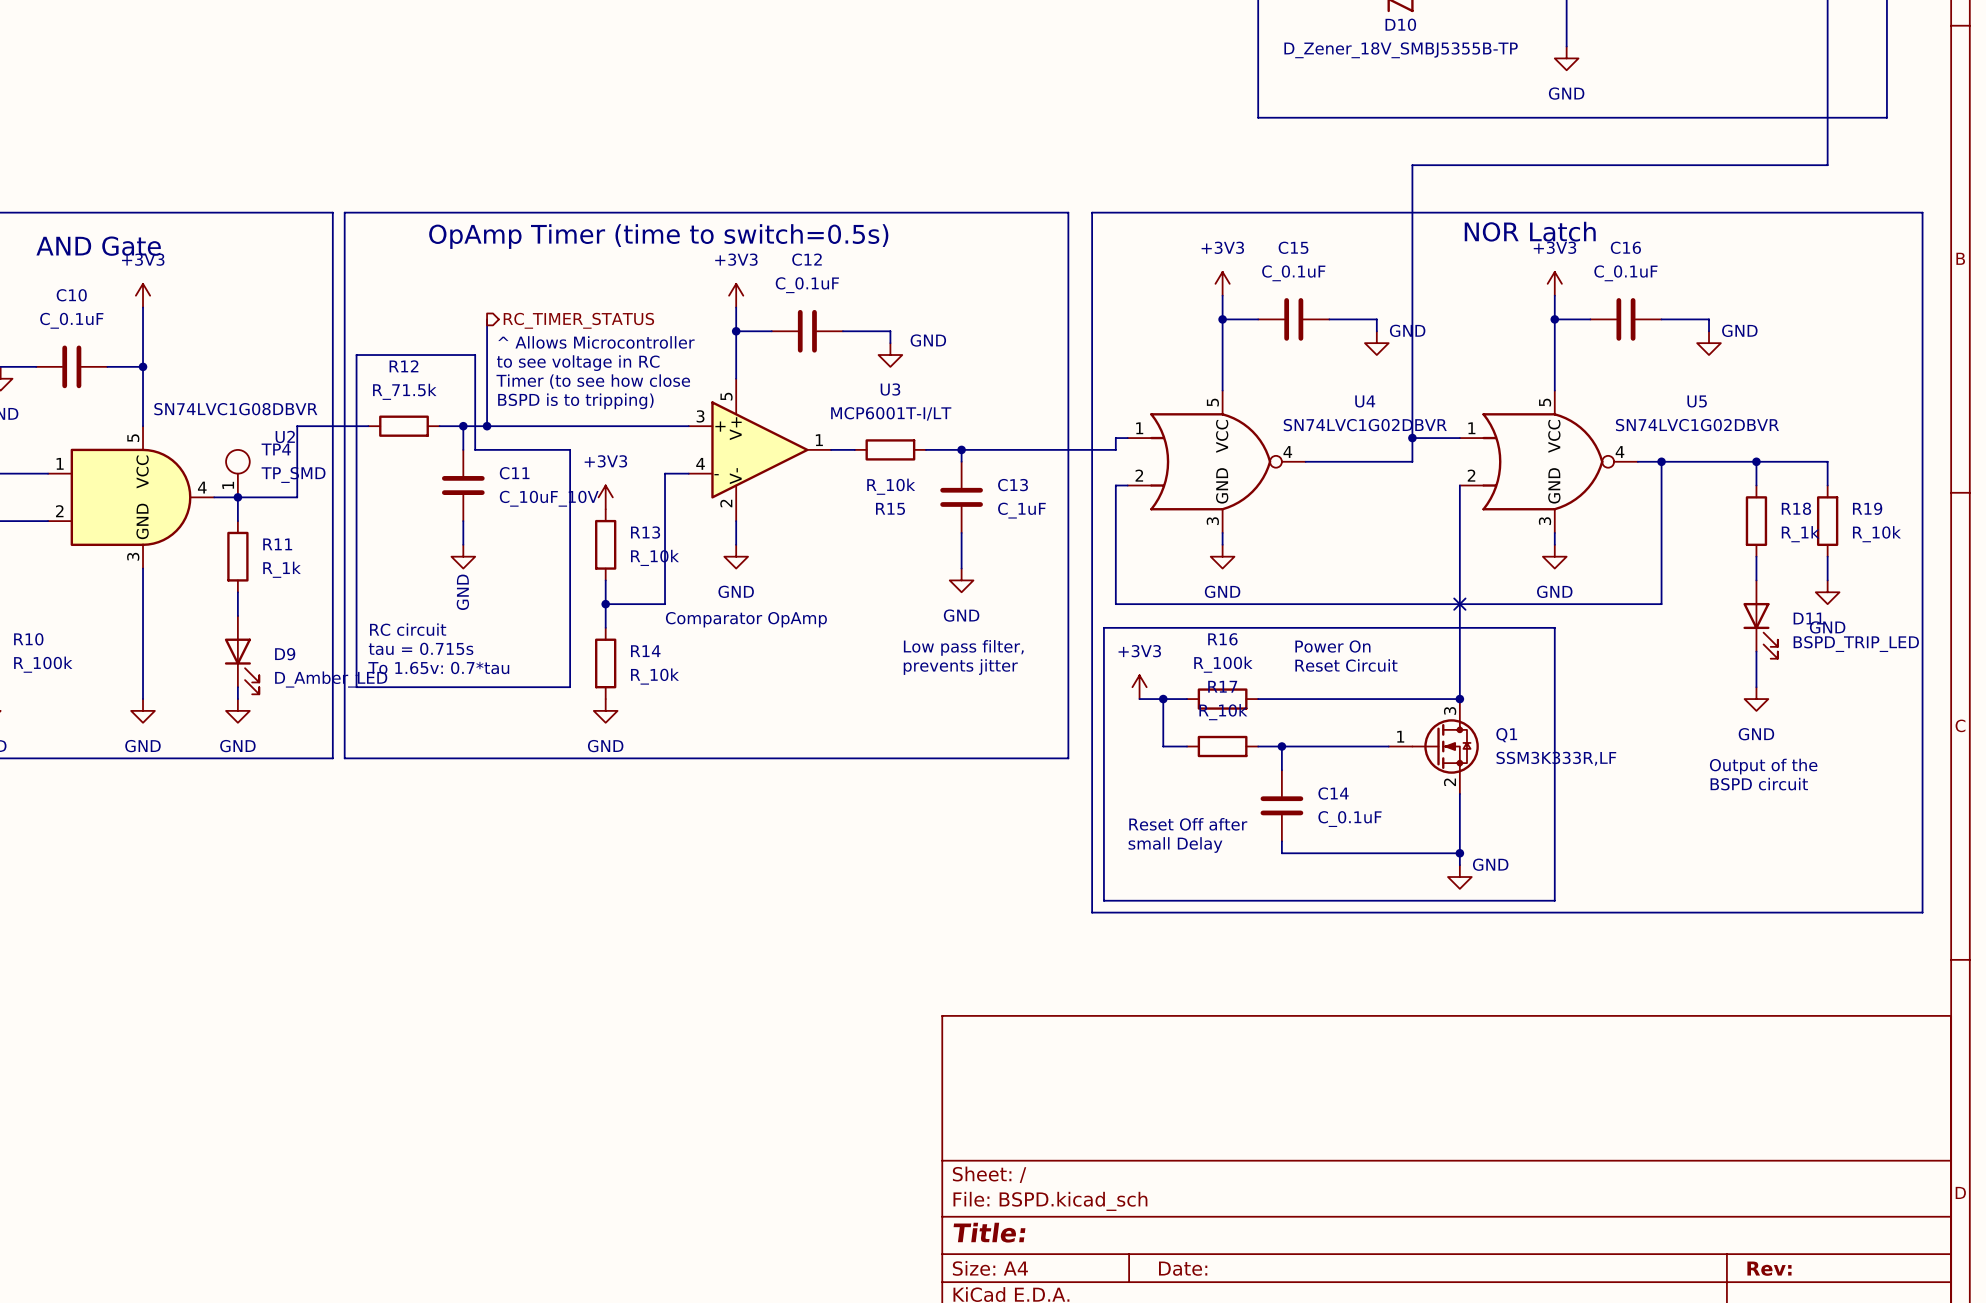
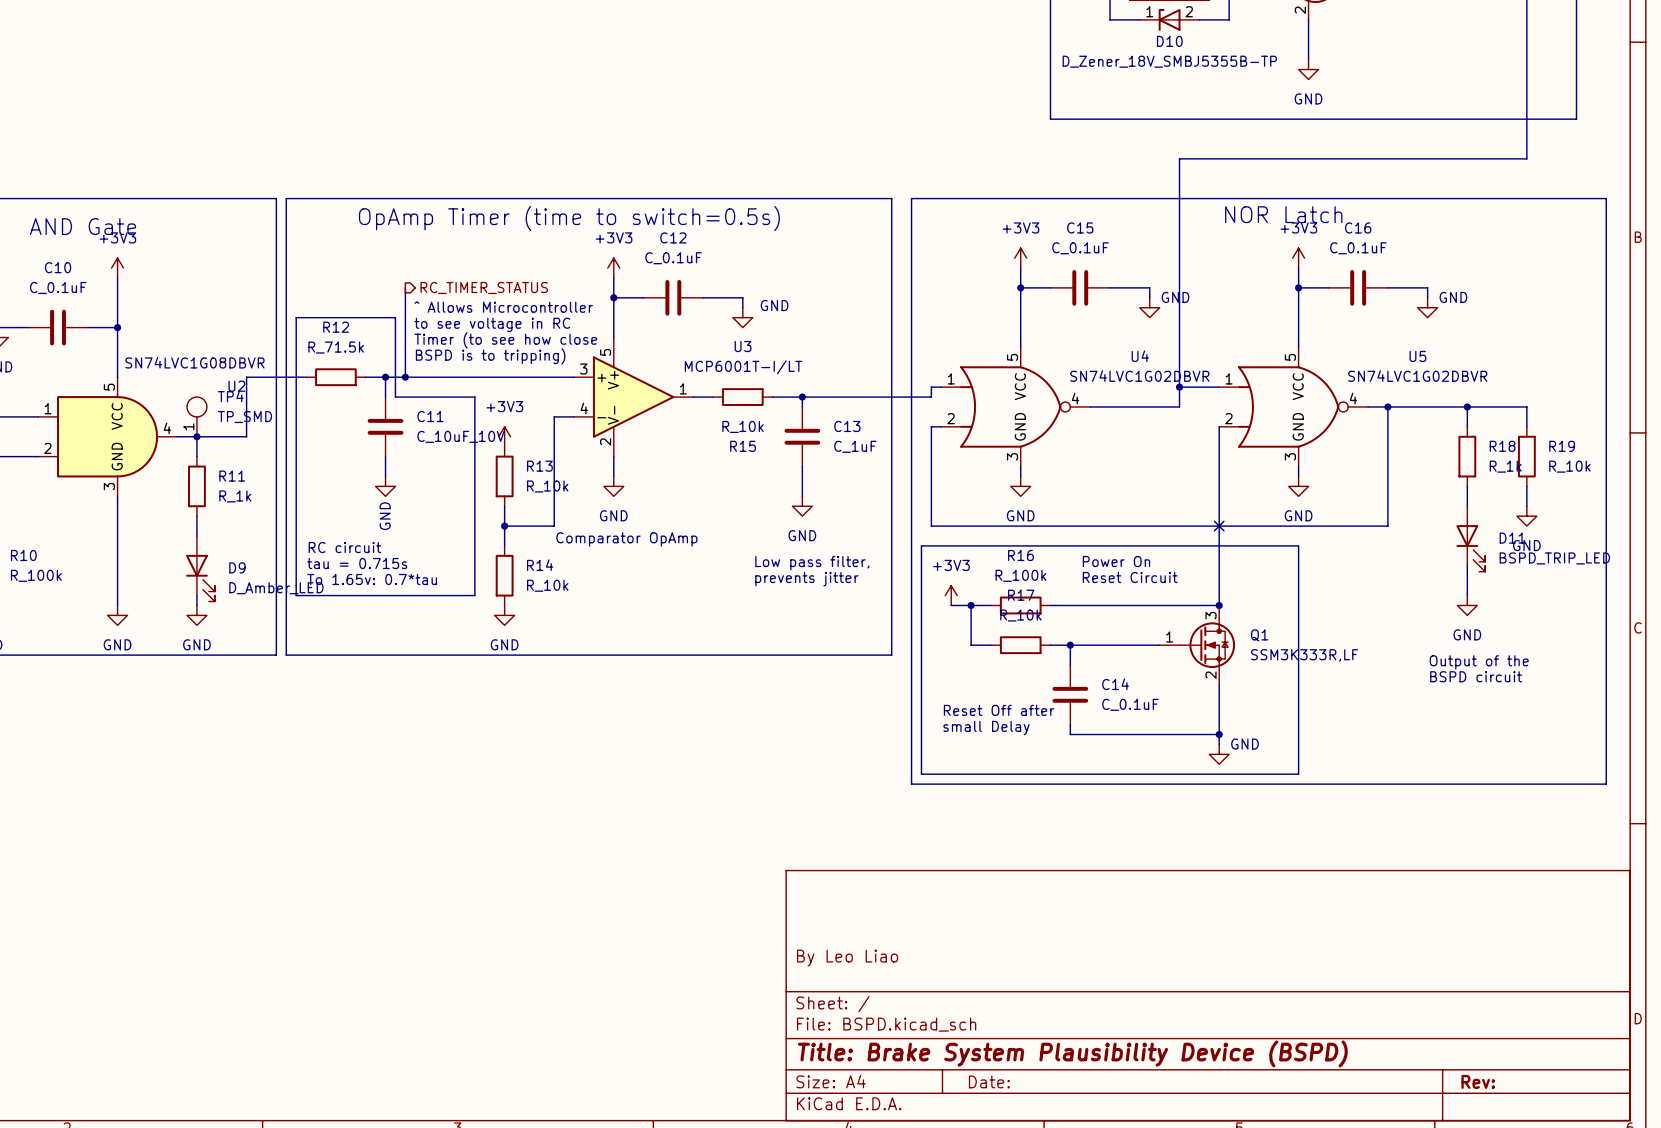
title block: none -> By Leo Liao (847, 958)
title block: Title: (989, 1232) -> Title: Brake System Plausibility Device (BSPD) (1072, 1053)

